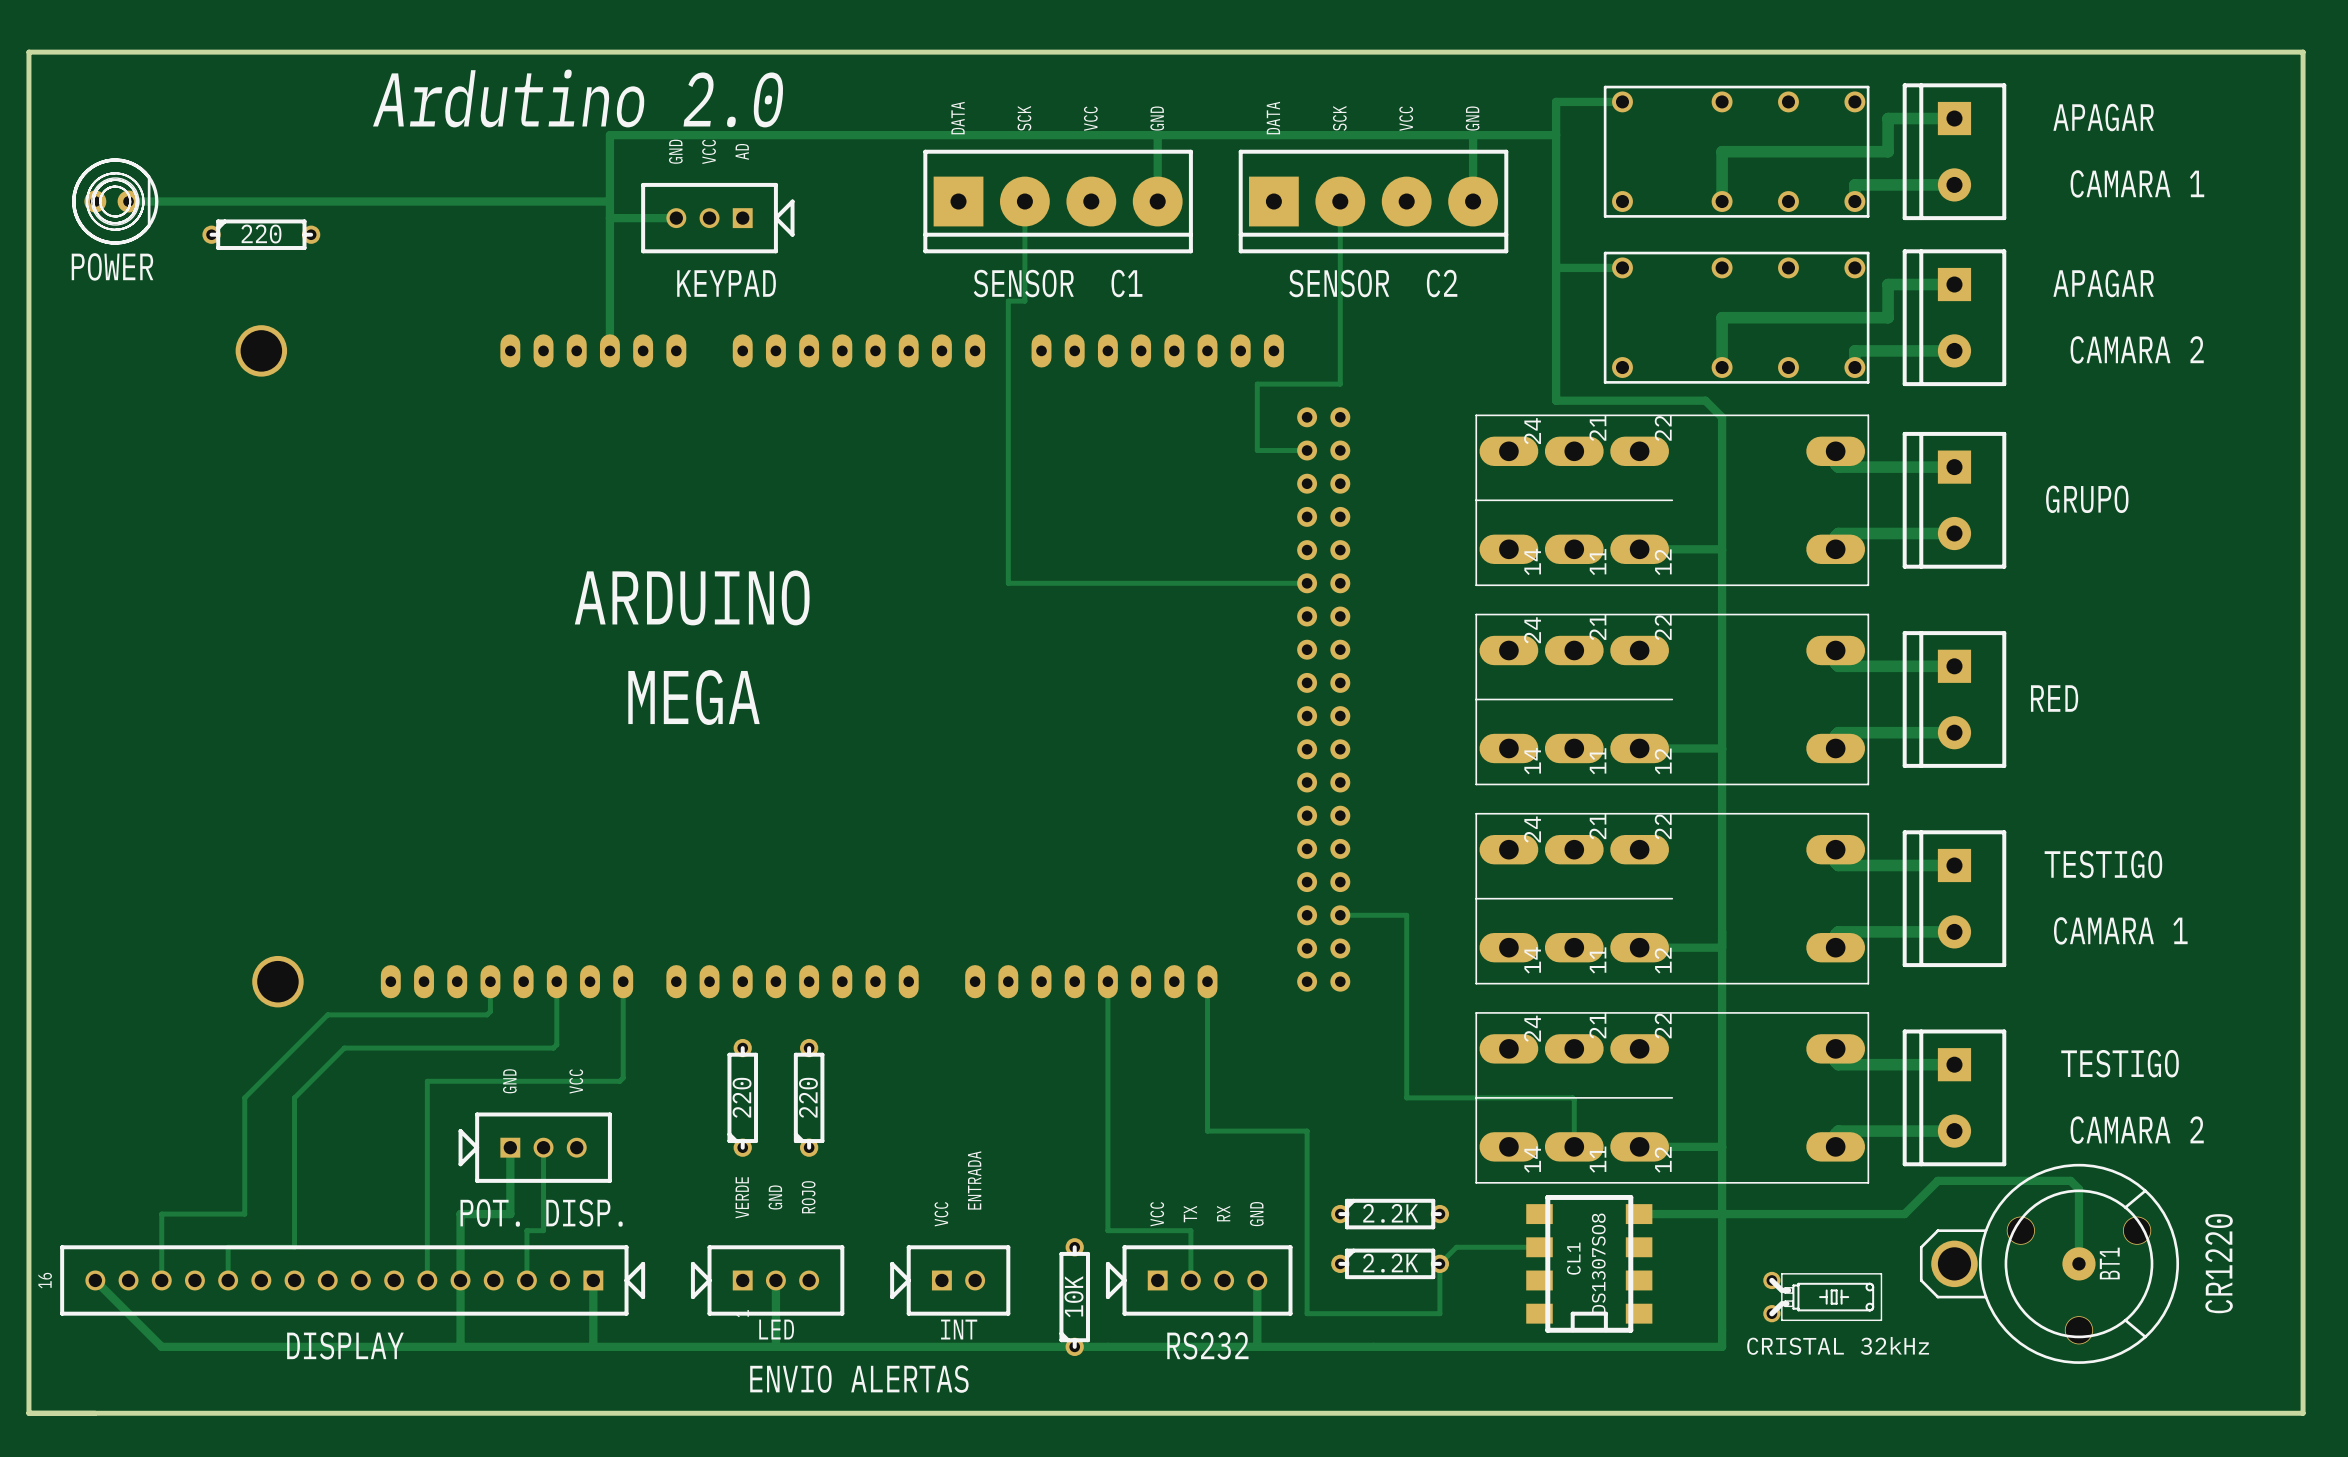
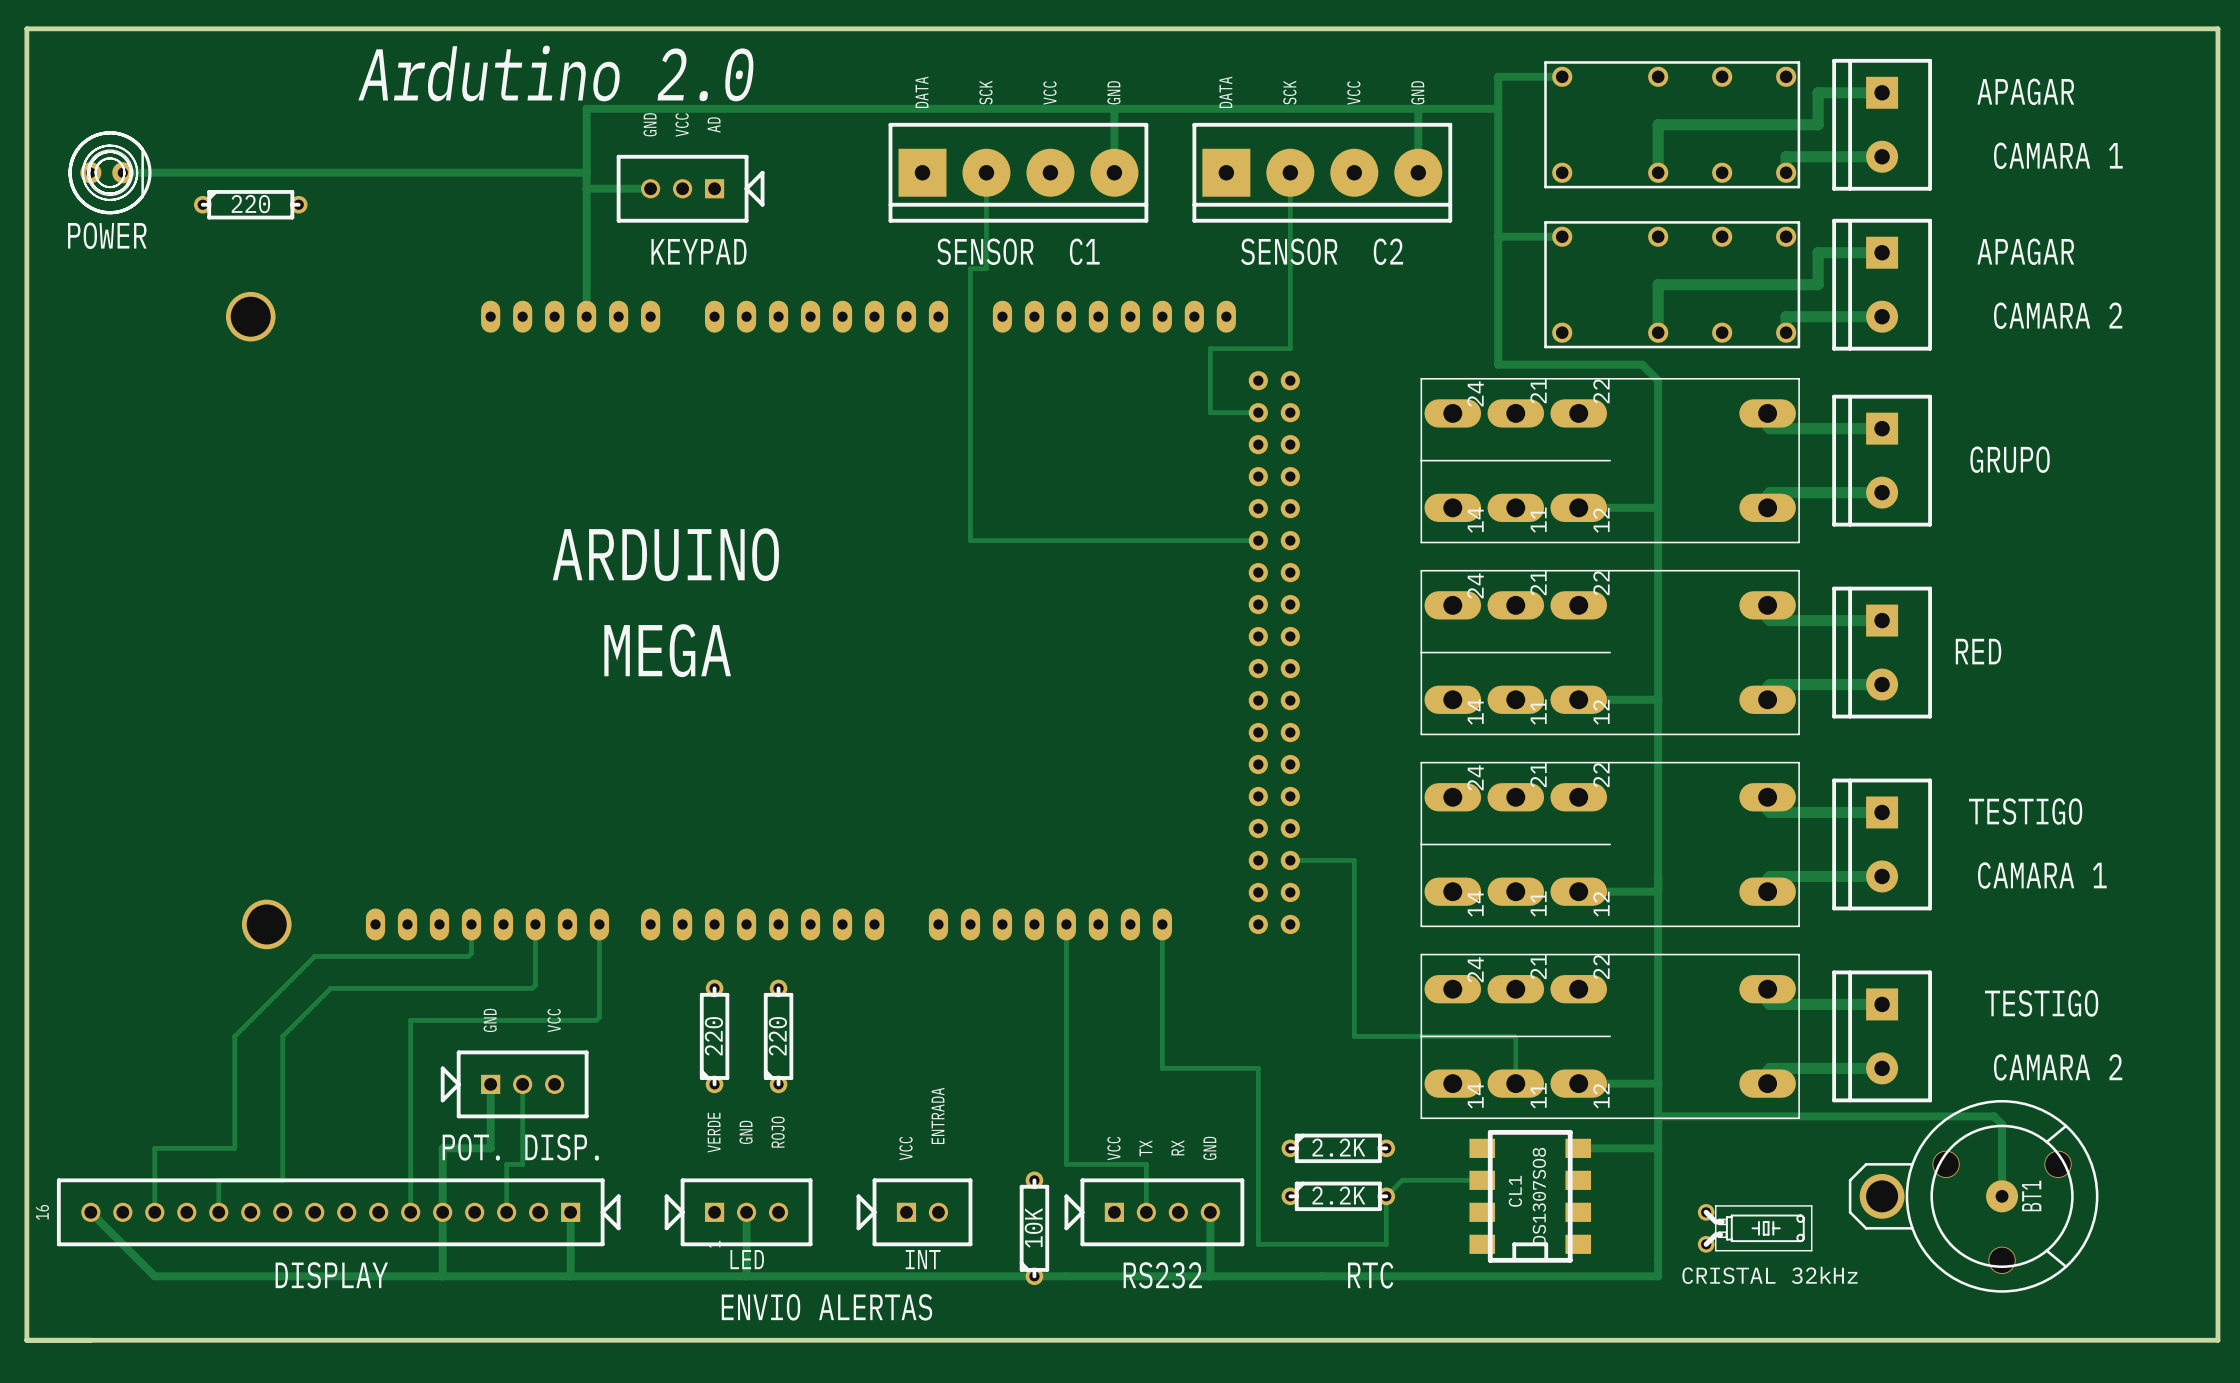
track: (1937, 1180) (1904, 1214) (1722, 1214) -> (1866, 1116) (1658, 1116)
text: CR1220 (2219, 1263) -> none
text: none -> RTC (1370, 1275)

